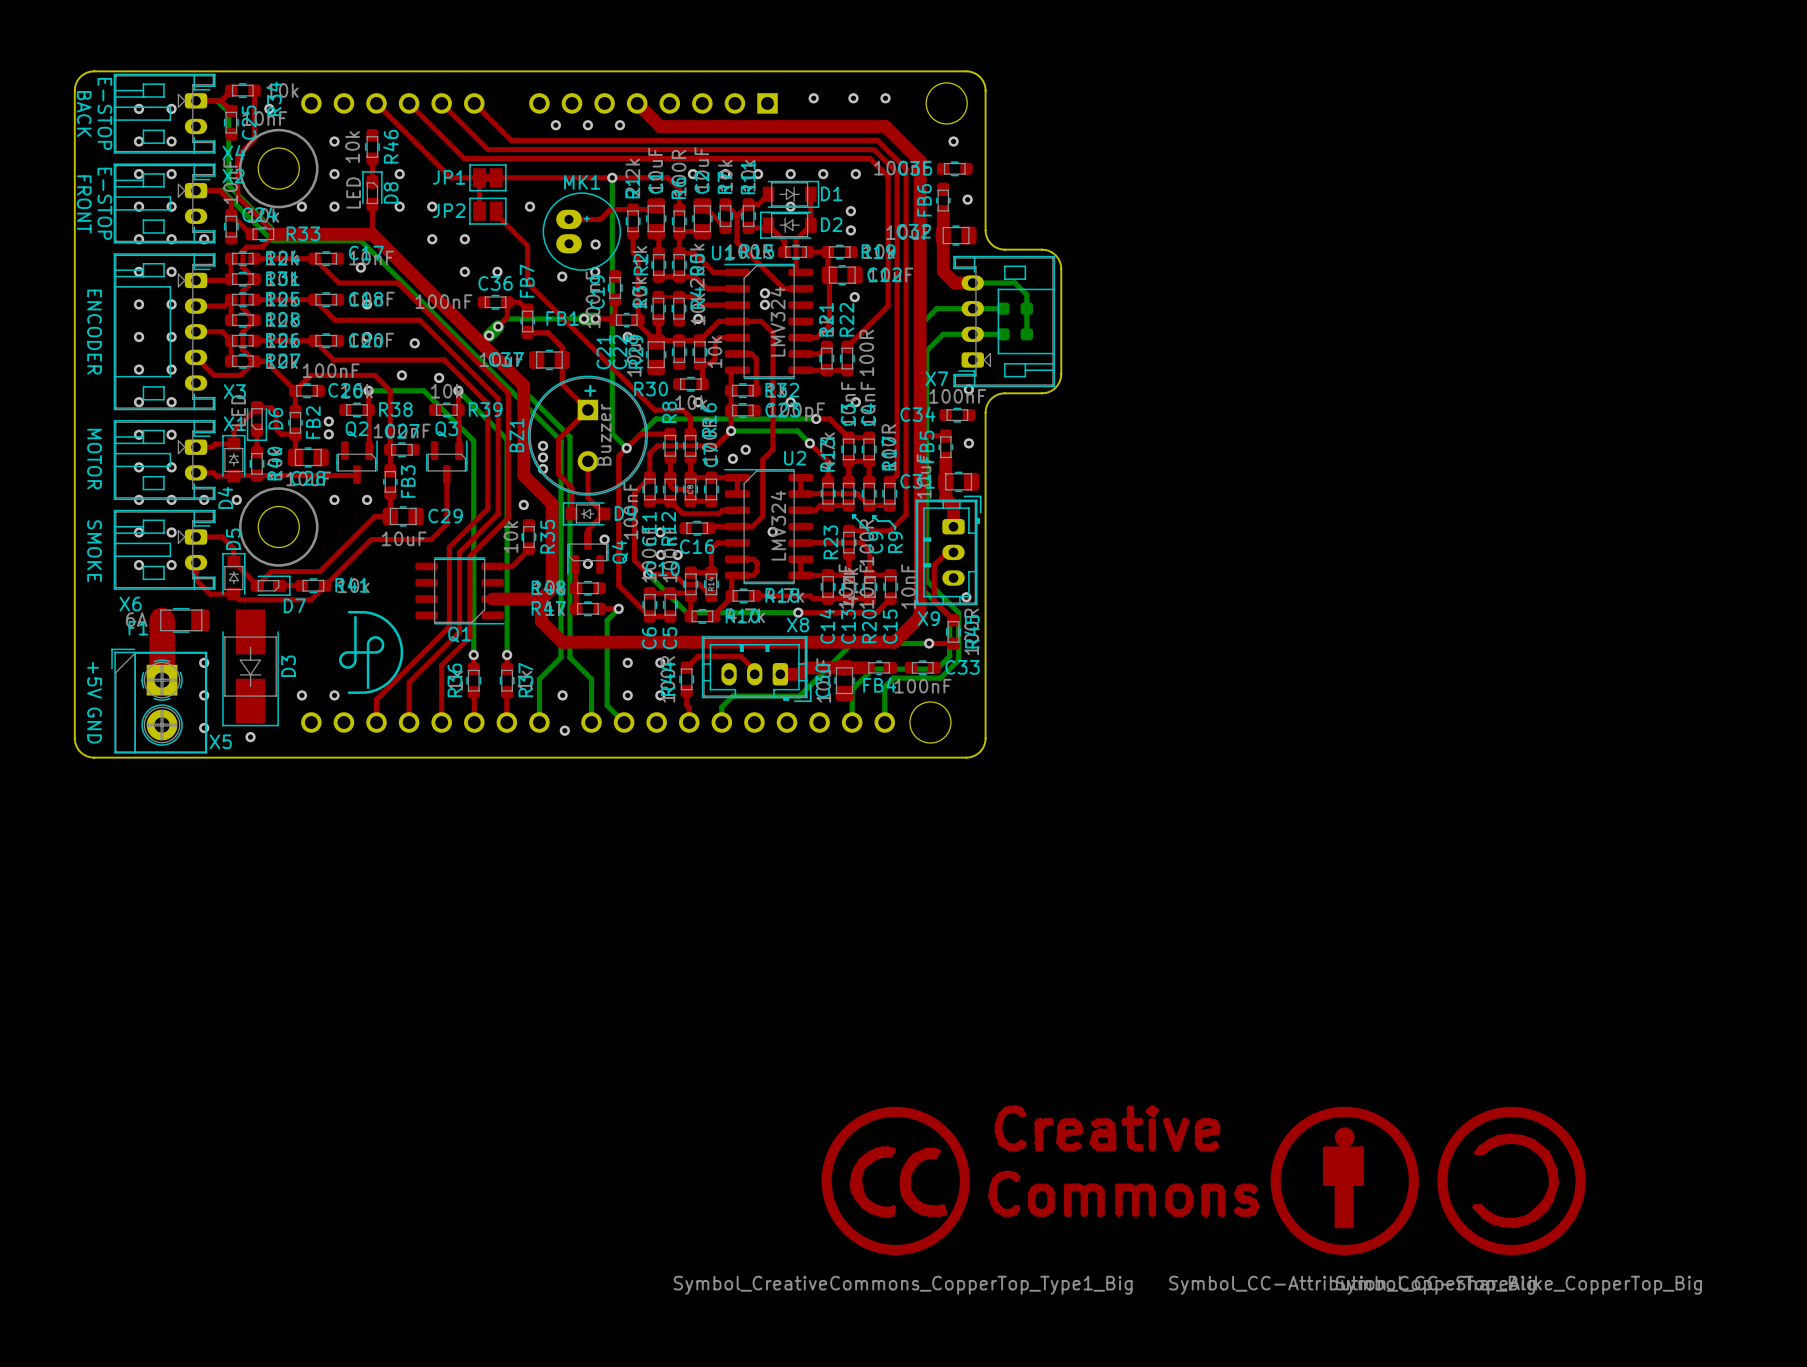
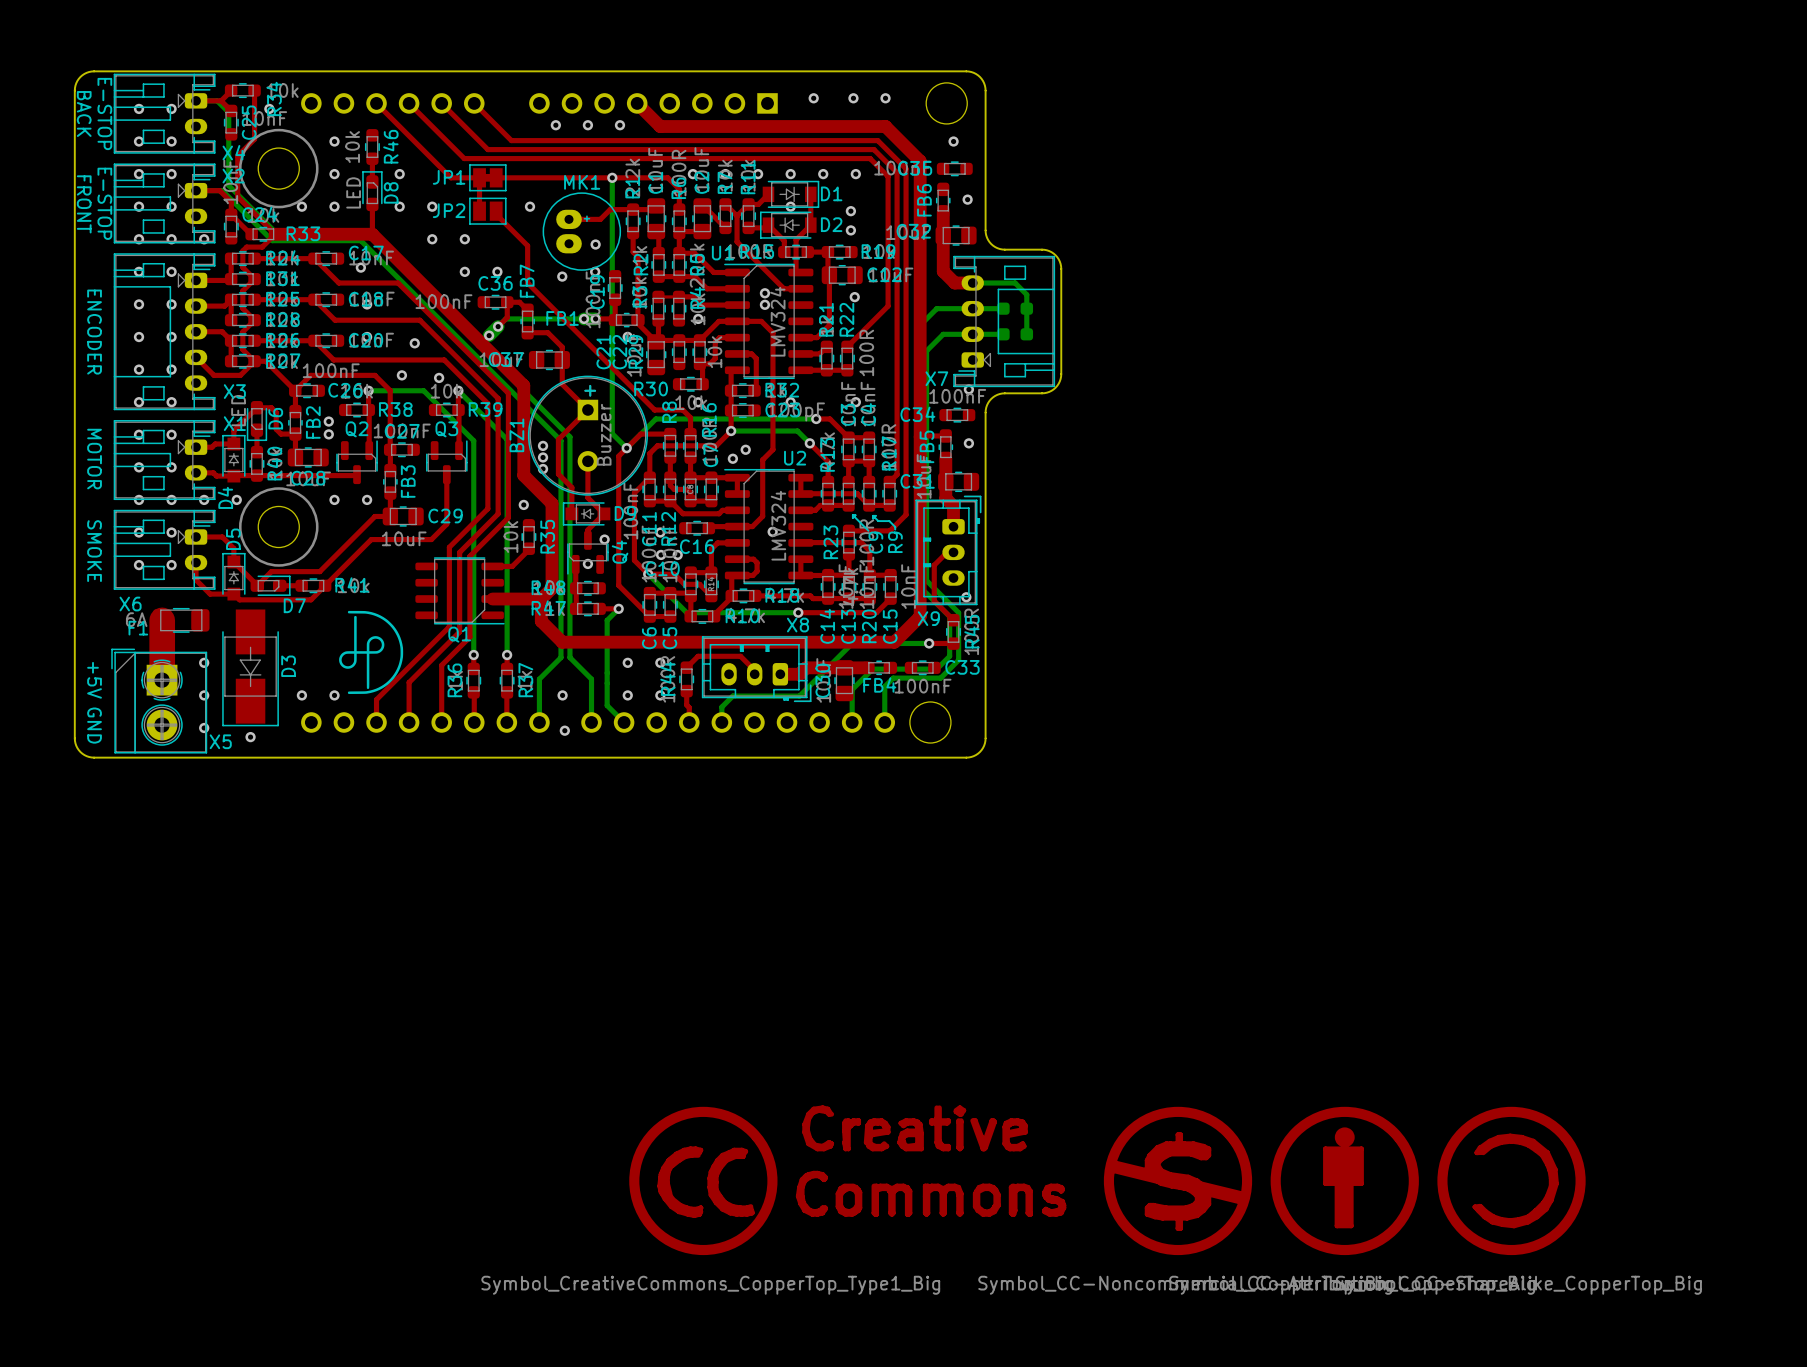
drawing: none -> [1103, 1106, 1253, 1256]
drawing position: (1040, 1180) -> (847, 1180)

